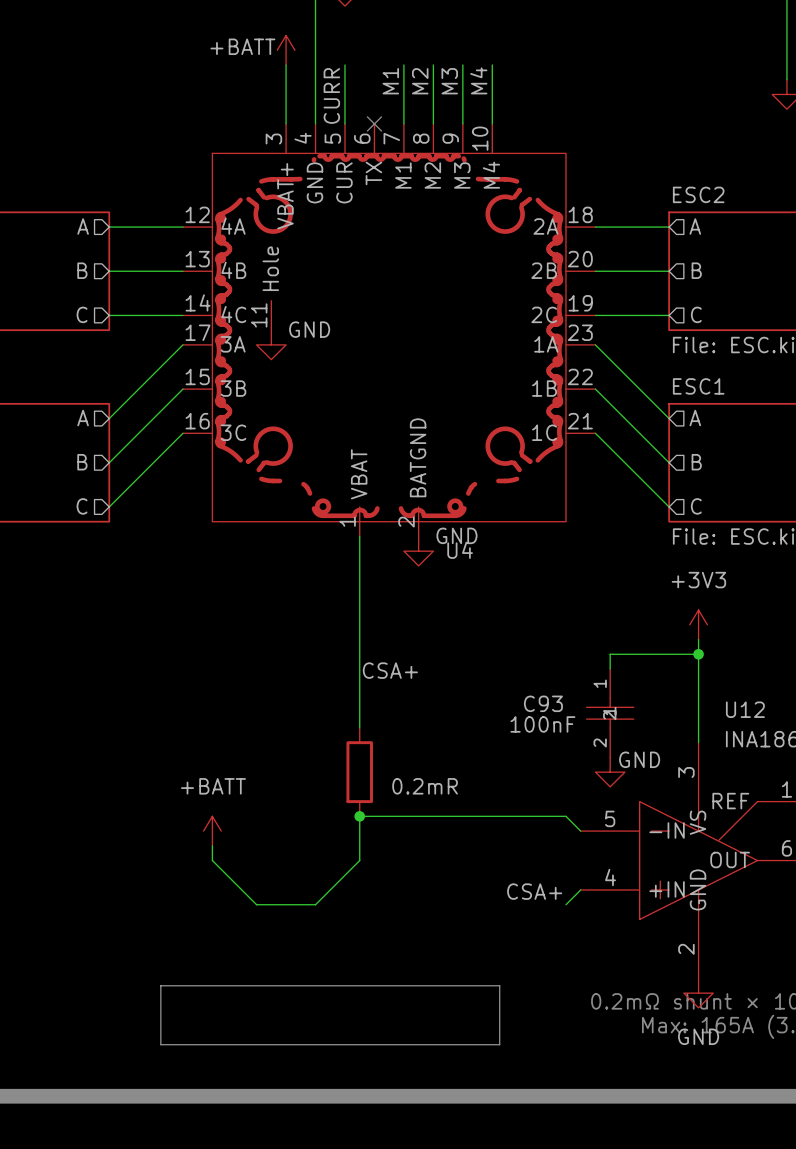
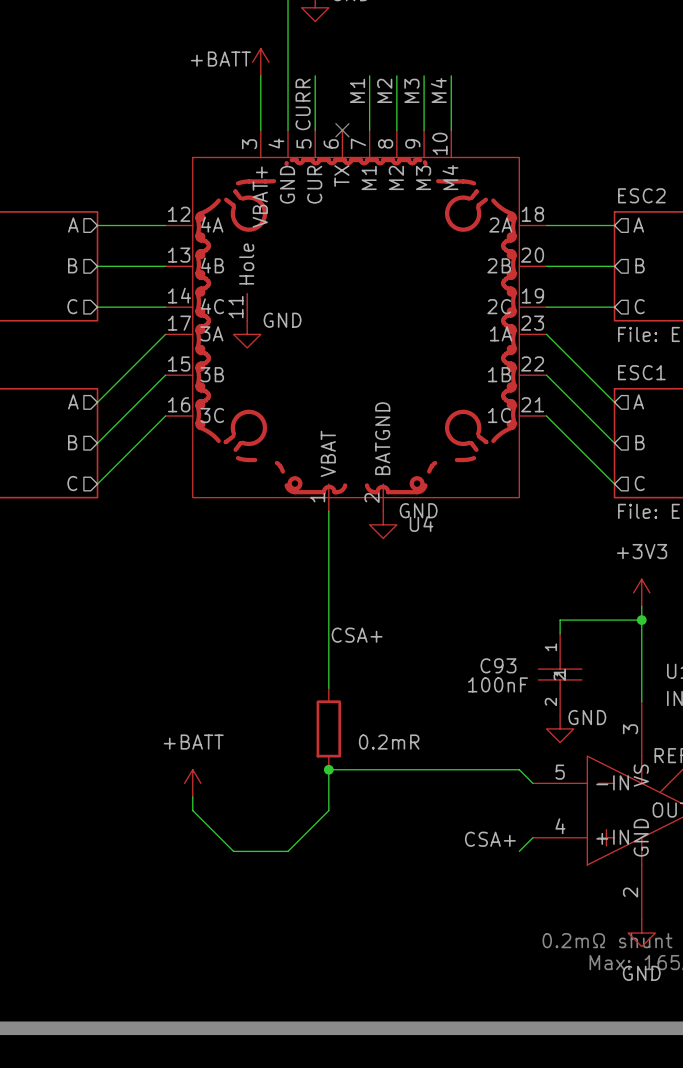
line: (160, 985) (499, 985) (499, 1044) (160, 1044) (160, 985) -> none

